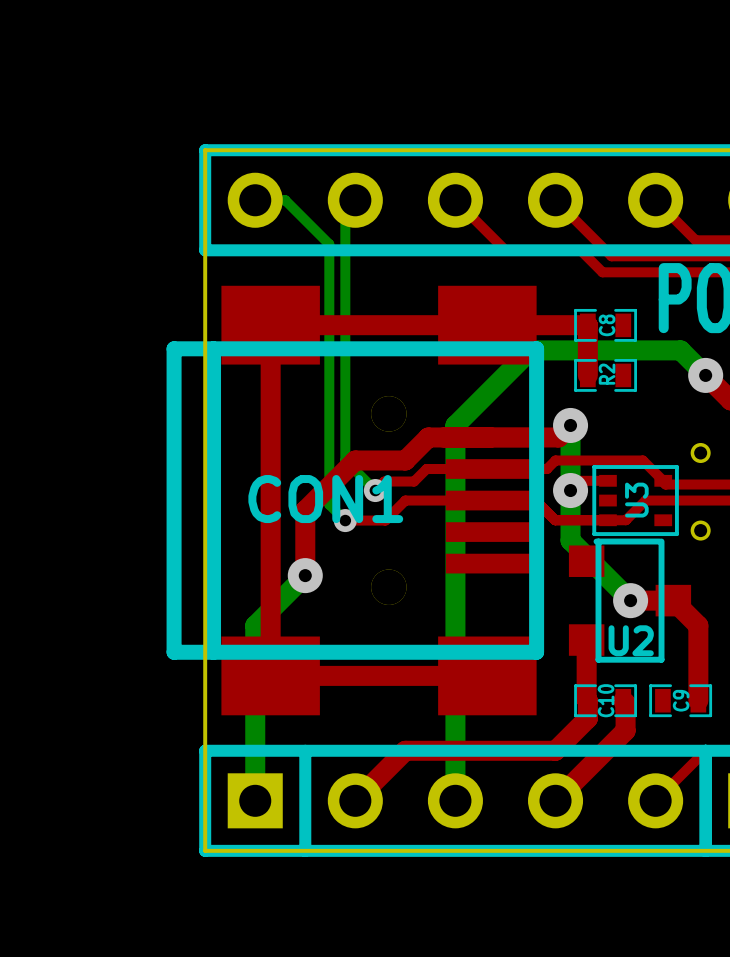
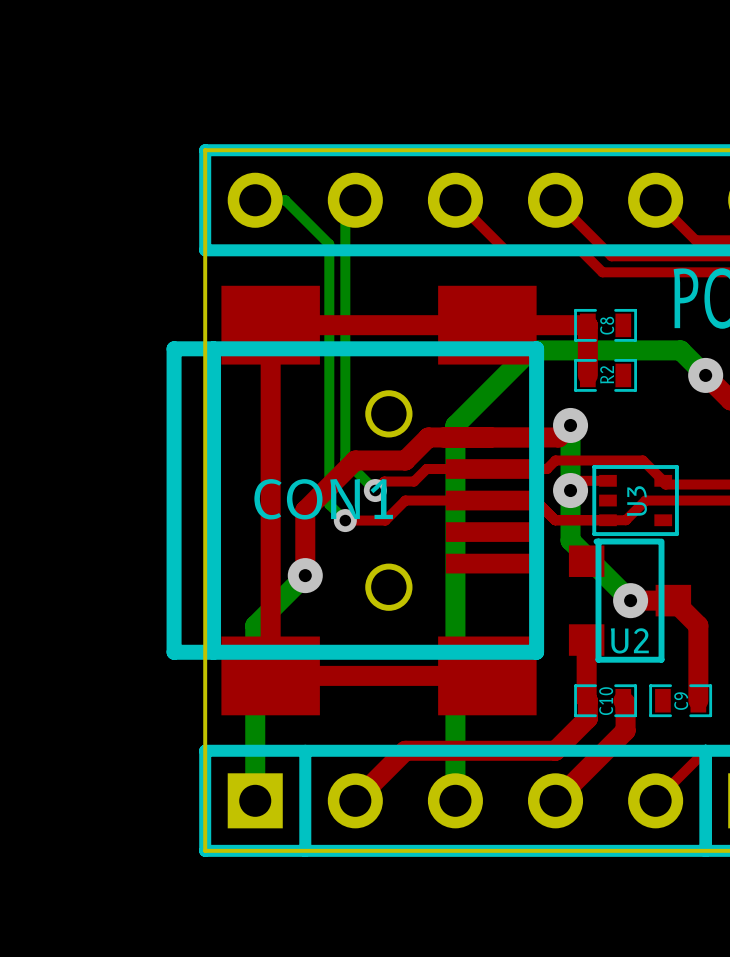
CON1 footprint: [166, 285, 545, 716] -> [166, 285, 545, 716]
part: (700, 452) -> none
part: (700, 530) -> none

